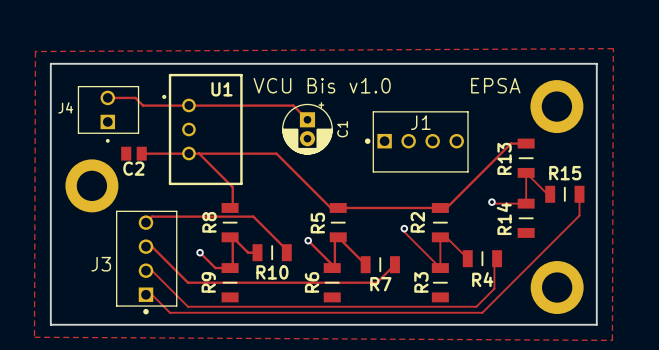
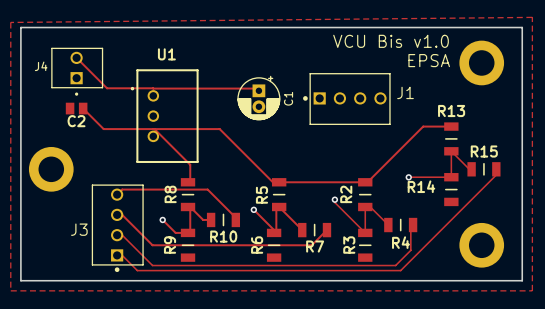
text: none -> VCU Bis v1.0 (391, 41)
zone outline: (613, 48) (612, 340) (34, 337) (35, 51) (613, 48) -> (532, 17) (10, 22) (10, 290) (532, 290) (532, 17)
track: none -> (76, 57) (107, 88) (256, 88) (258, 90)
text: none -> EPSA (429, 60)
text: VCU Bis v1.0 EPSA (386, 85) -> none
U1 name position: U1 (221, 89) -> U1 (166, 54)
track: (107, 97) (135, 97) (143, 105) (293, 105) (307, 119) -> none
part position: (556, 106) -> (481, 62)
J4 position: (108, 114) -> (77, 71)
J1 name position: J1 (420, 122) -> J1 (405, 92)
C1 position: (307, 128) -> (258, 98)
J1 position: (416, 141) -> (346, 99)
track: (526, 143) (511, 143) (446, 207) (443, 207) -> (451, 126) (423, 126) (367, 182)
track: none -> (154, 129) (161, 136)
C2 position: (133, 153) -> (76, 108)
track: (141, 153) (276, 153) -> (83, 108) (103, 129) (219, 129) (227, 136)
R13 name rotation: 0° (504, 158) -> 90° clockwise (451, 111)
R13 position: (526, 158) -> (451, 138)
part position: (91, 185) -> (51, 169)
track: (553, 188) (547, 194) (526, 172) (526, 203) (491, 202) -> (474, 164) (469, 169) (451, 151) (451, 177) (408, 177)
R15 position: (564, 194) -> (483, 169)
track: (579, 194) (579, 215) -> (499, 164) (499, 172) (482, 188)
R14 name rotation: 0° (504, 218) -> 90° clockwise (421, 186)
R14 position: (526, 218) -> (451, 189)
part position: (557, 287) -> (481, 245)
board edge: (50, 324) (50, 63) (596, 63) (596, 324) -> (36, 280) (20, 280) (20, 27) (522, 27) (522, 280) (497, 280)

